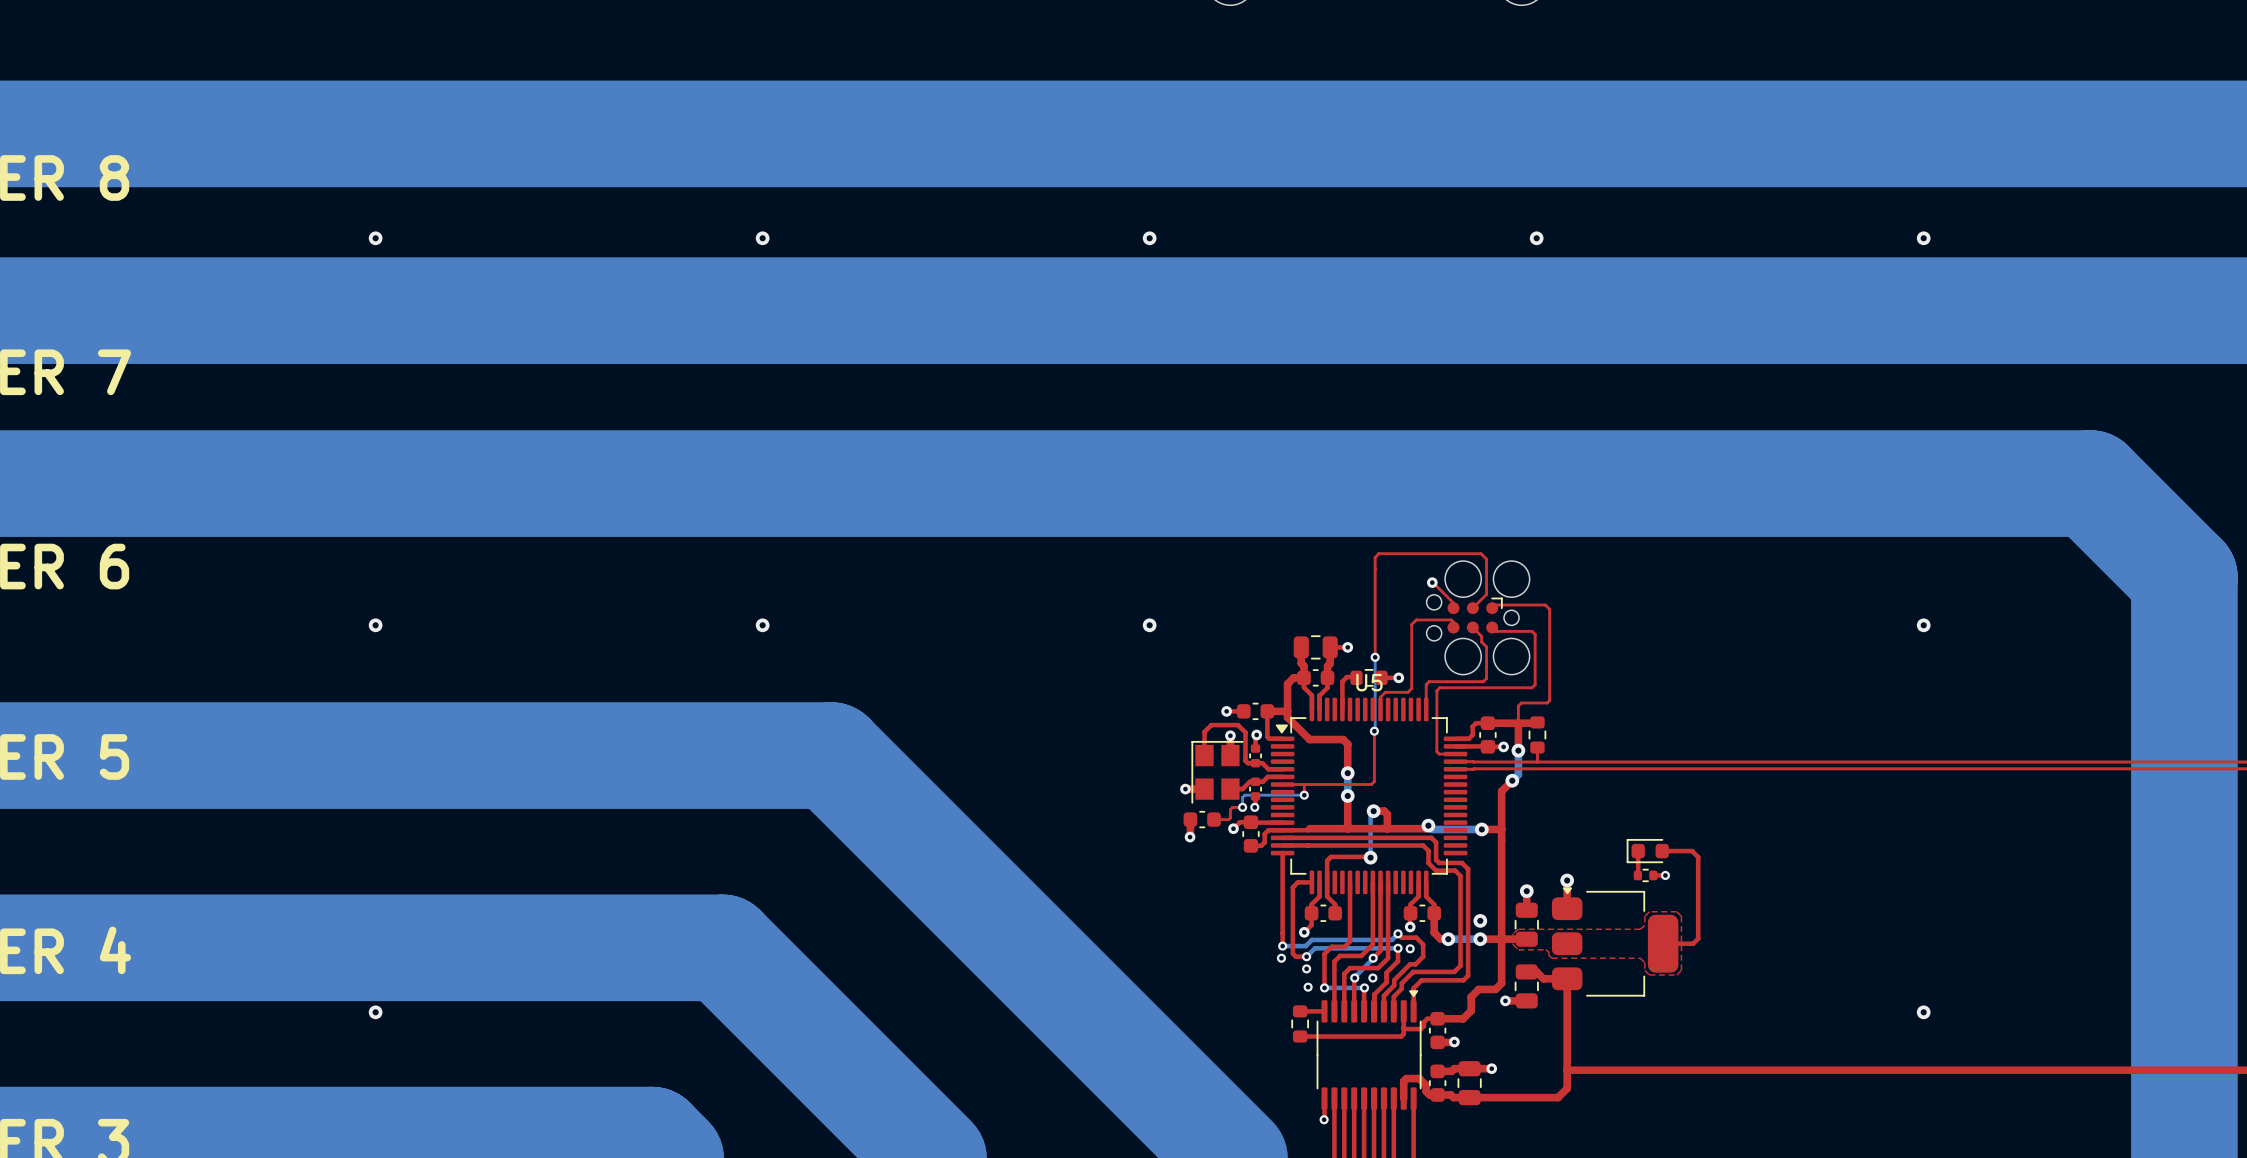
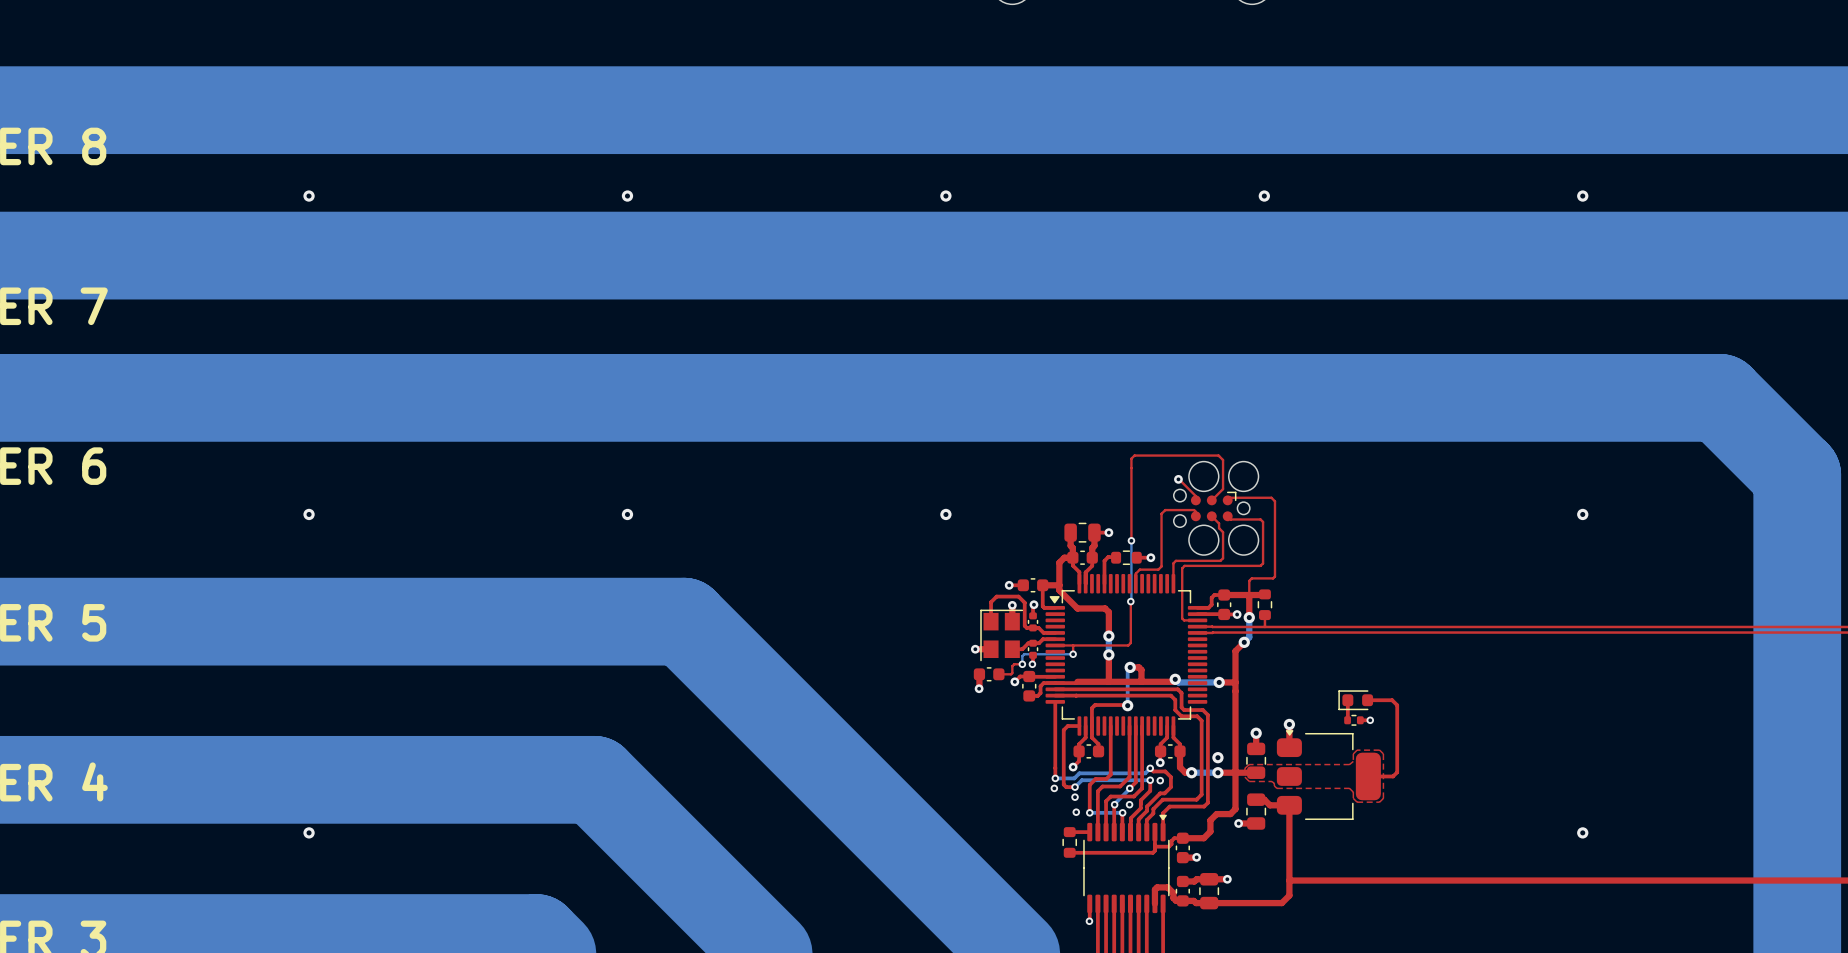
U5 name: U5 (1369, 682) -> none

